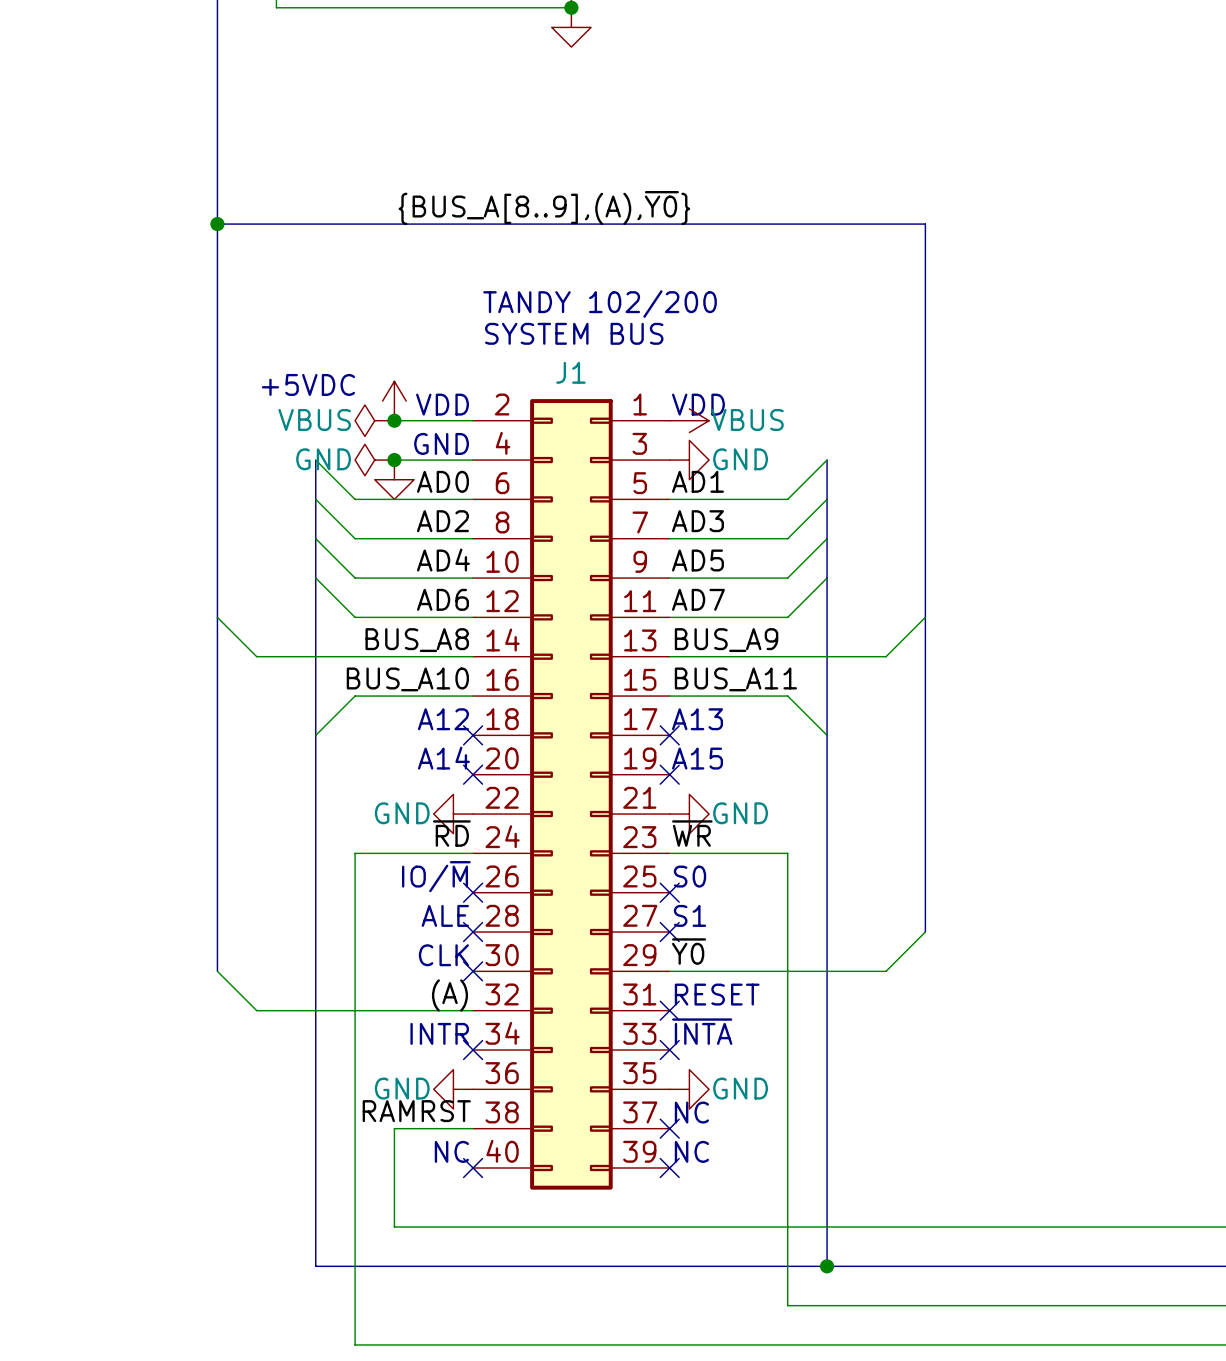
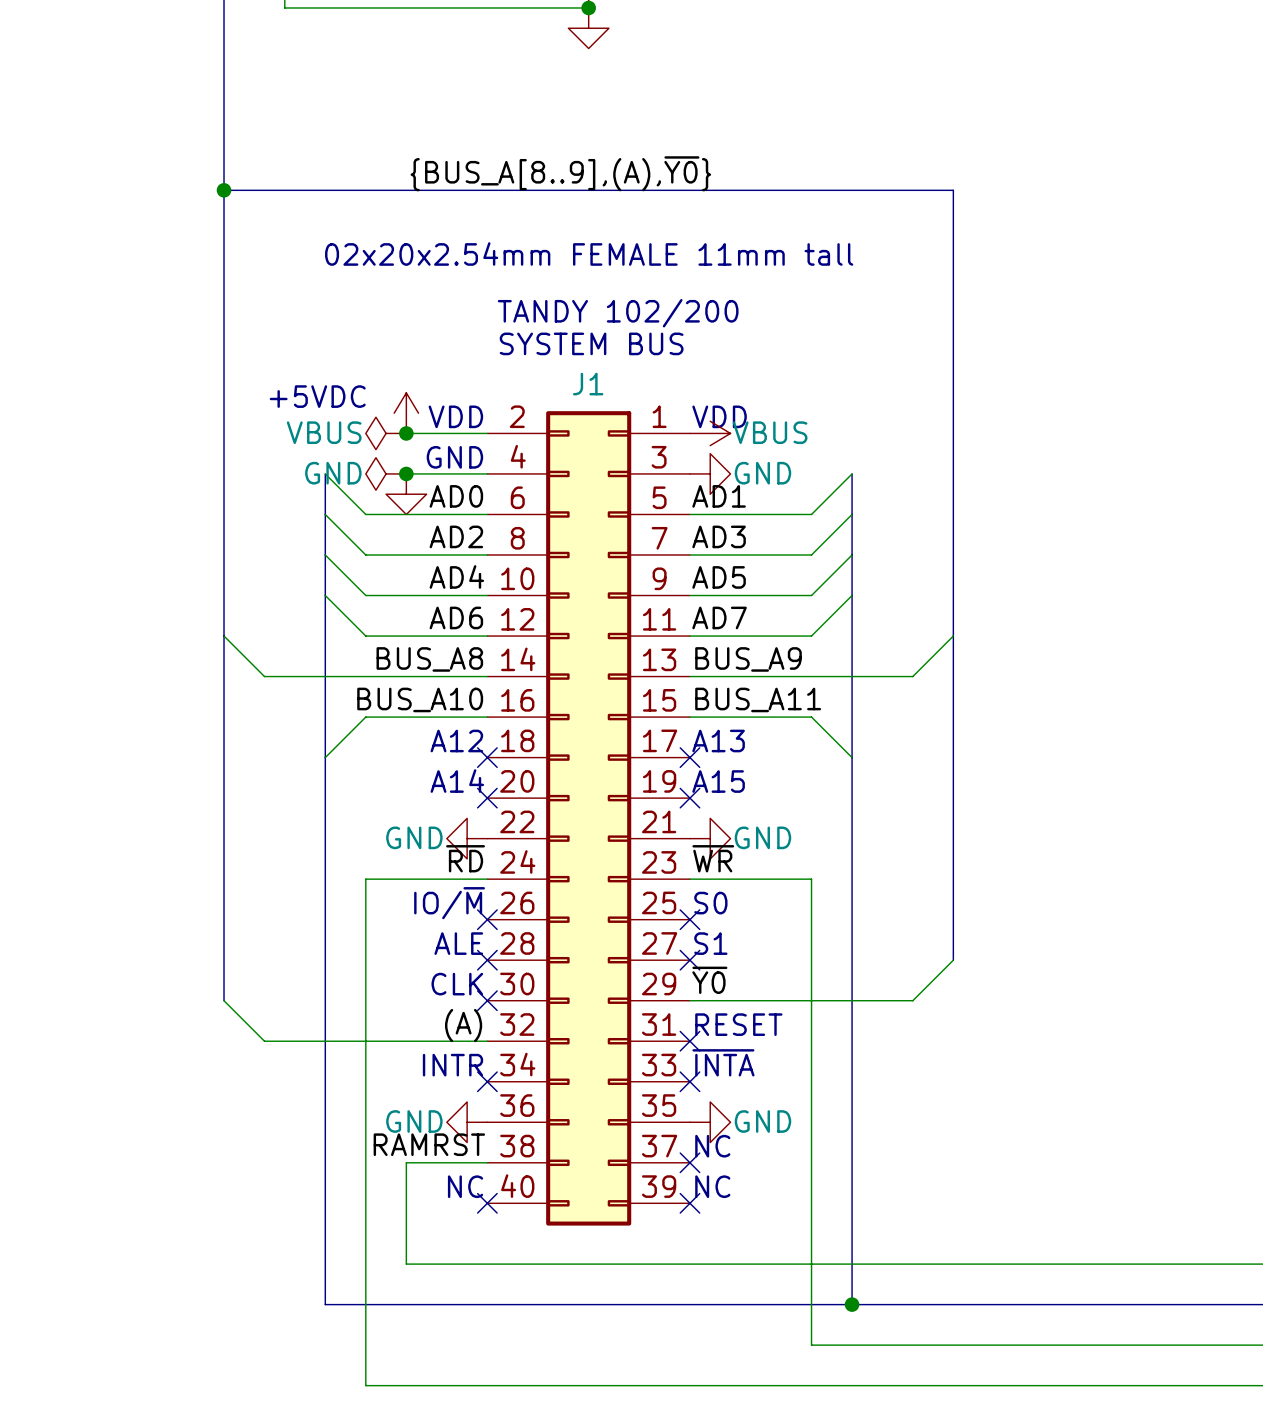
label position: {BUS_A[8..9],(A),~{Y0}} (544, 208) -> {BUS_A[8..9],(A),~{Y0}} (560, 173)
bus: (217, 224) (925, 224) -> (224, 190) (953, 190) (953, 230)
junction position: (217, 224) -> (224, 190)
text: none -> 02x20x2.54mm FEMALE 11mm tall (589, 253)

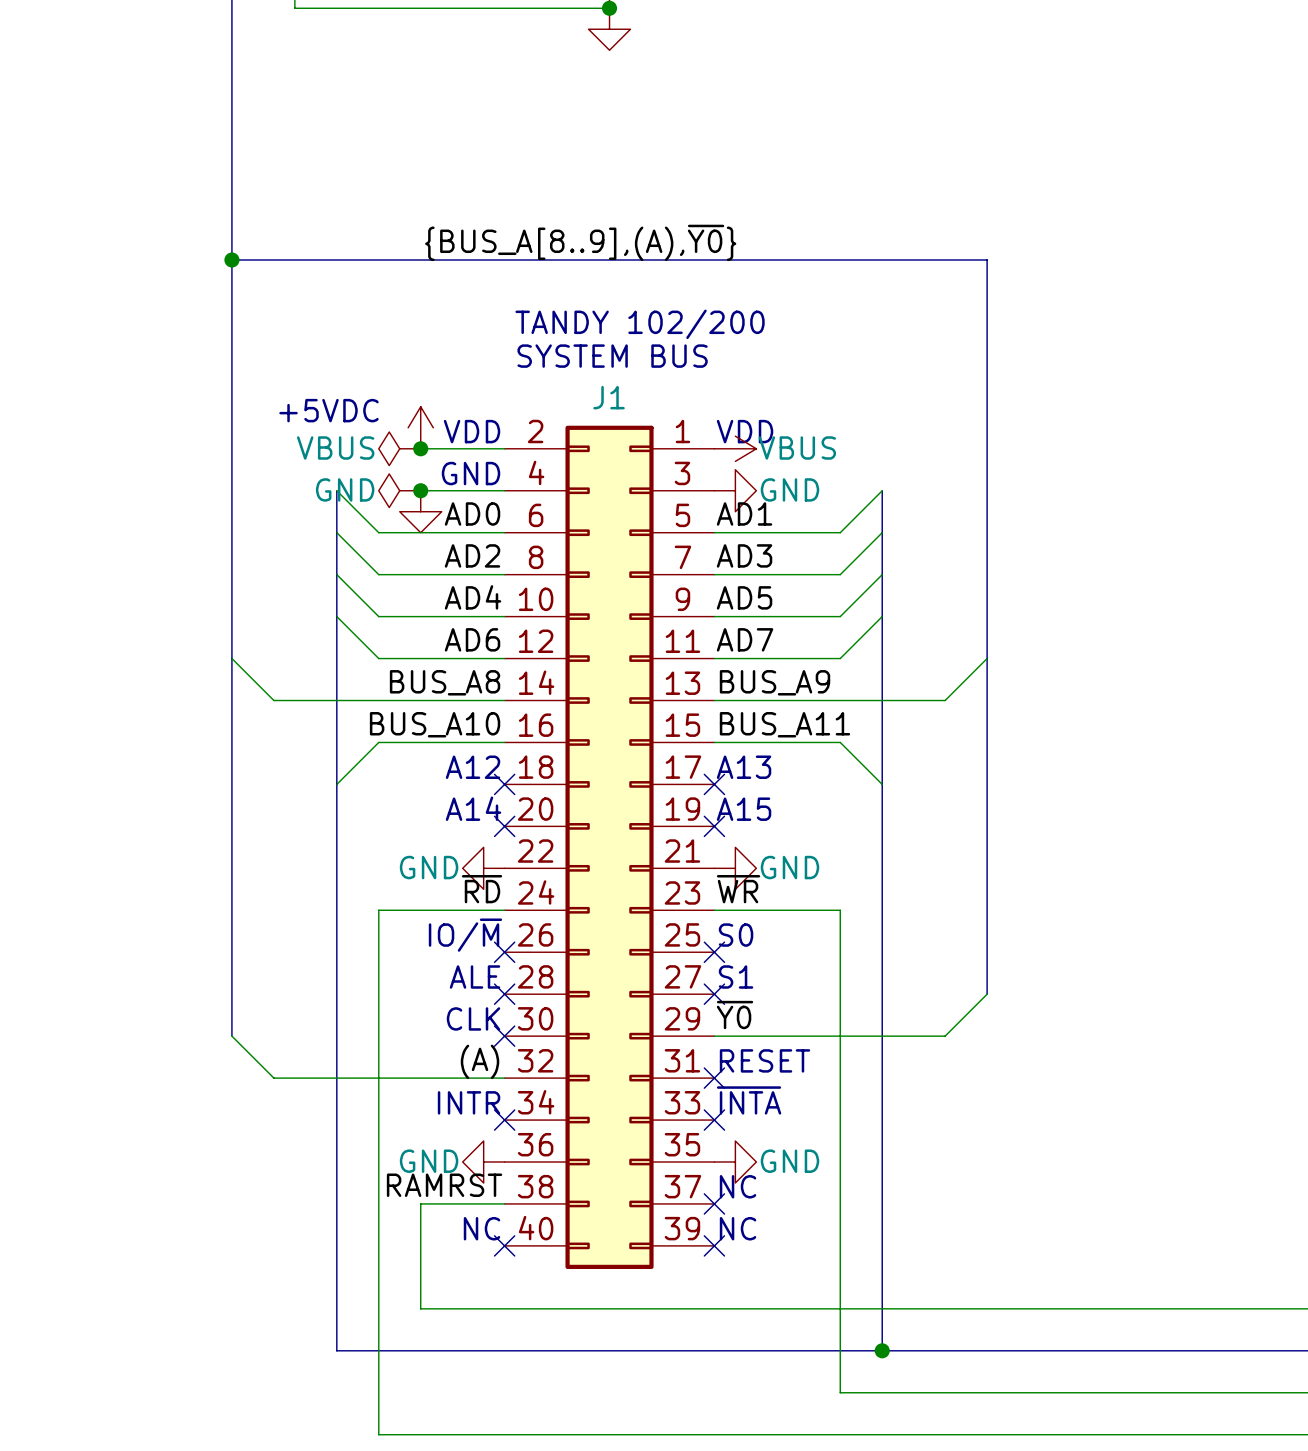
label position: {BUS_A[8..9],(A),~{Y0}} (560, 173) -> {BUS_A[8..9],(A),~{Y0}} (580, 242)
bus: (224, 190) (953, 190) (953, 251) -> (231, 260) (987, 260)
junction position: (224, 190) -> (231, 260)
text: 02x20x2.54mm FEMALE 11mm tall (589, 253) -> none

